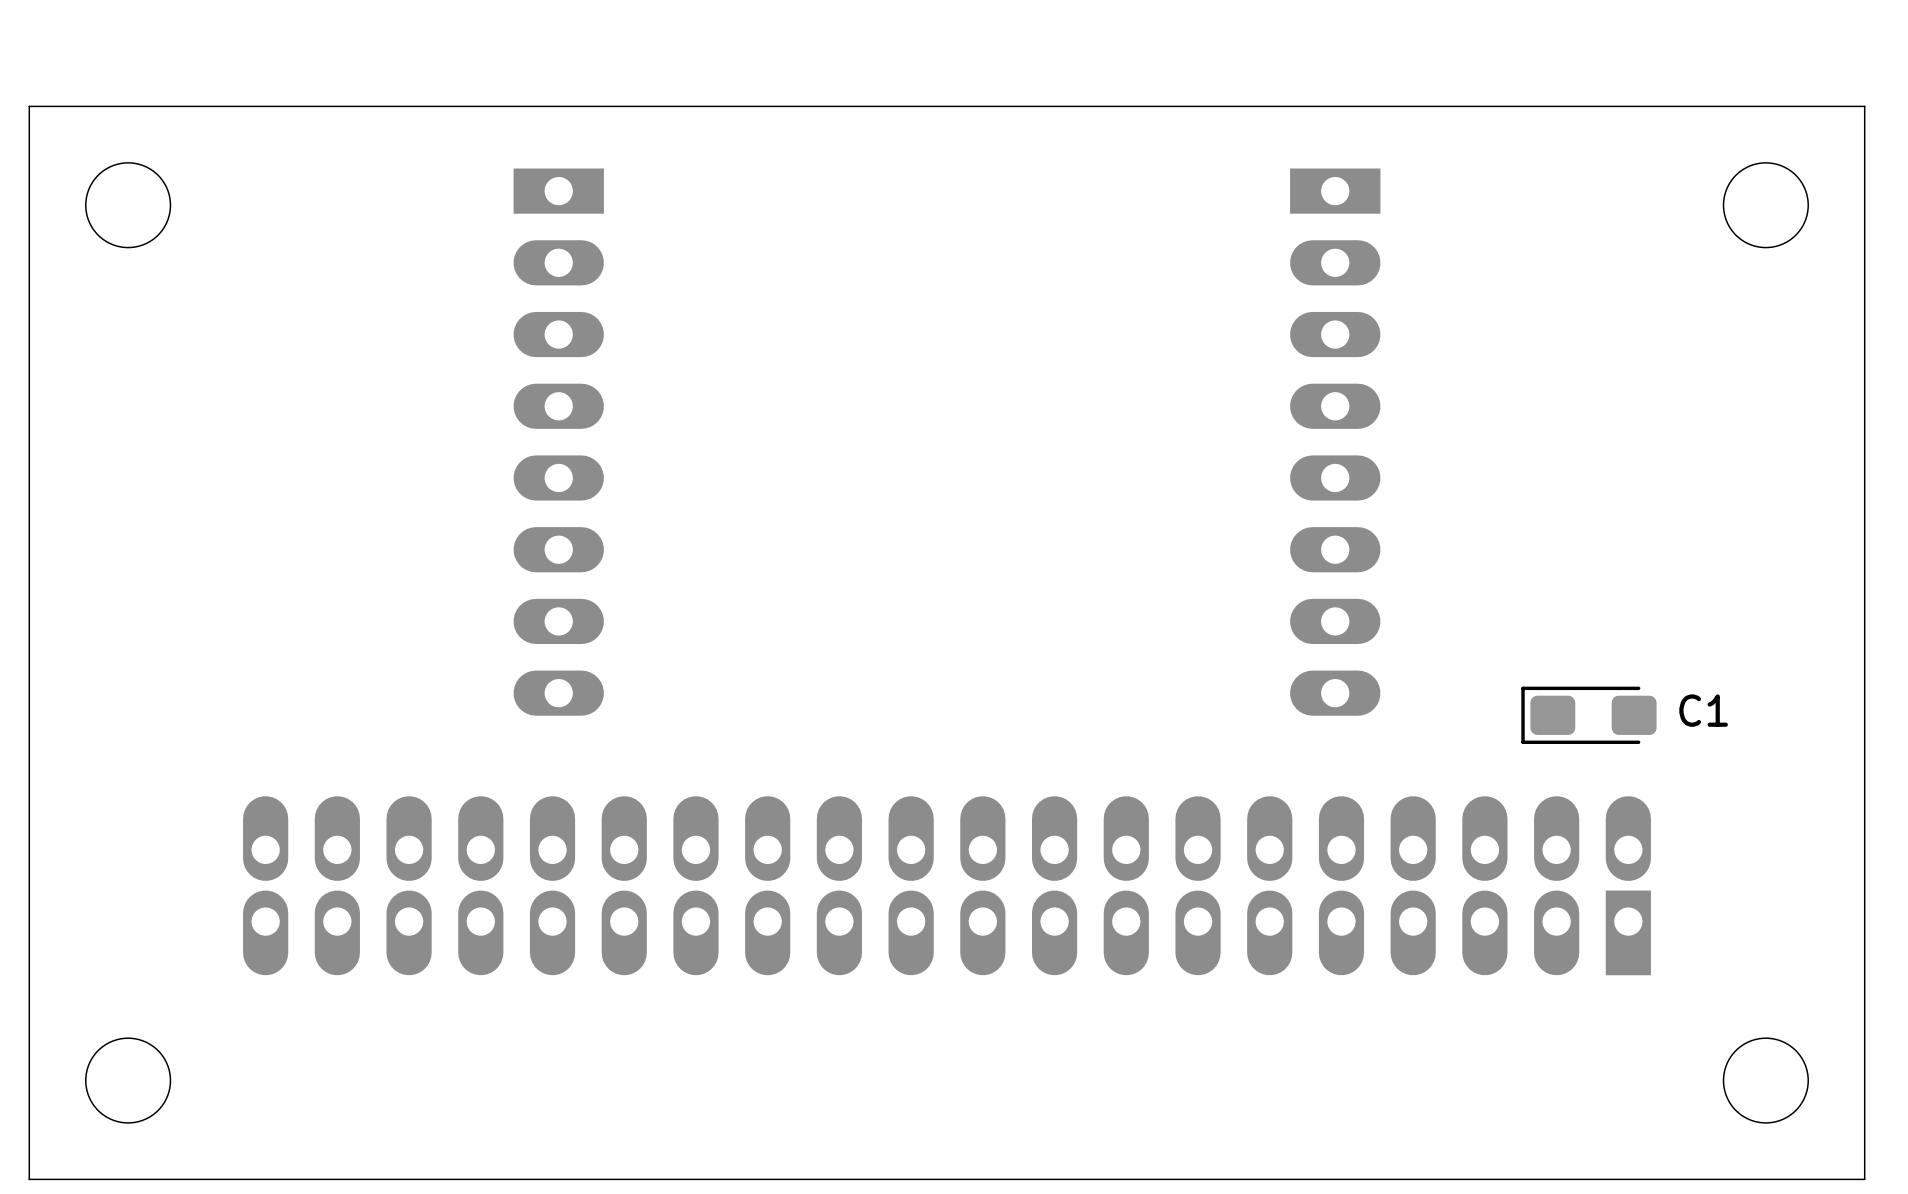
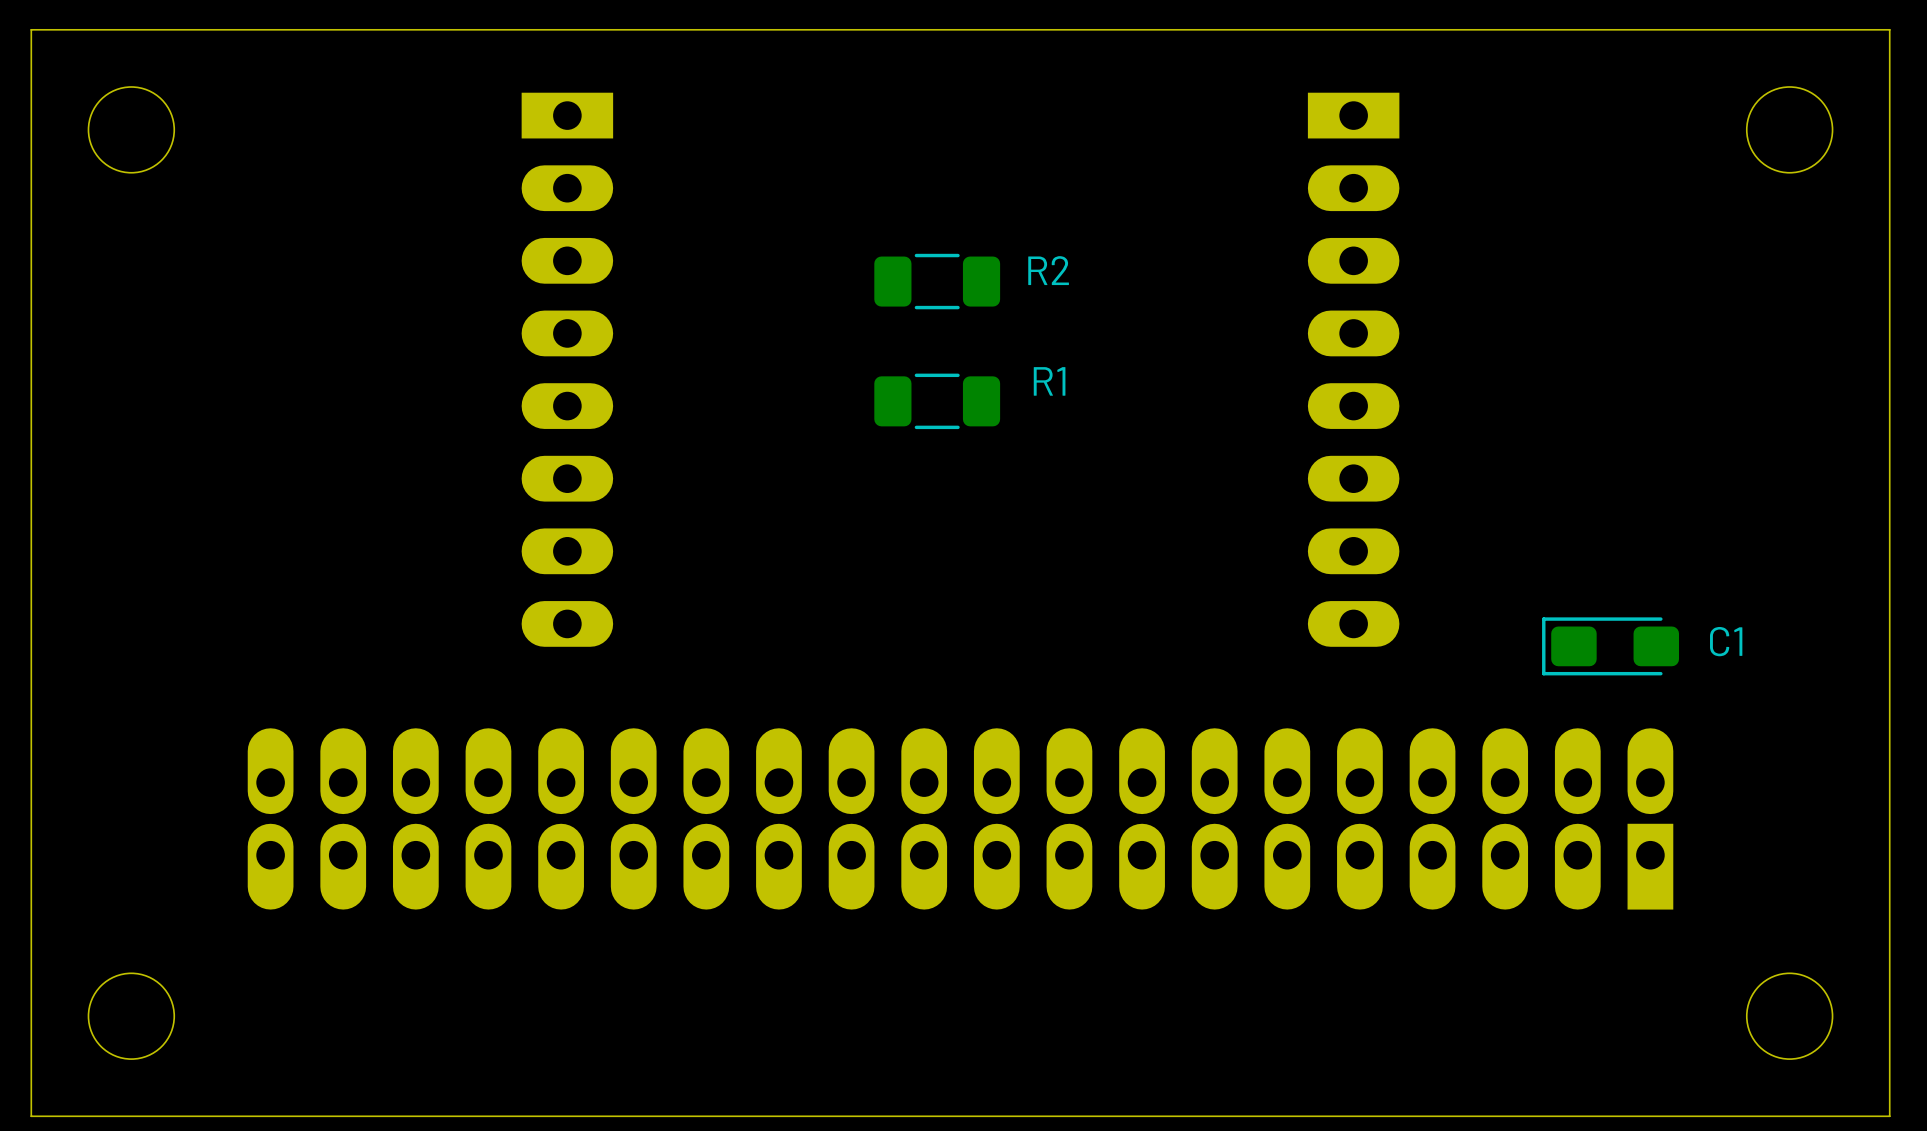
R2: none -> (937, 281)
R1: none -> (937, 401)

